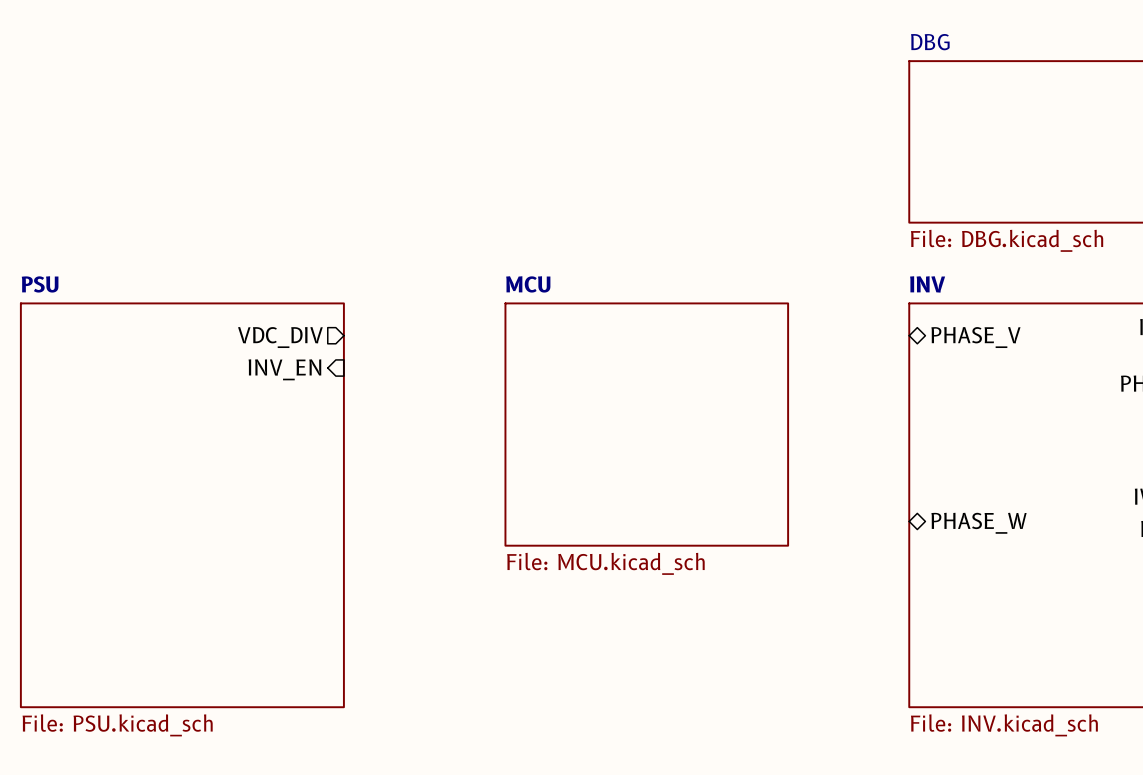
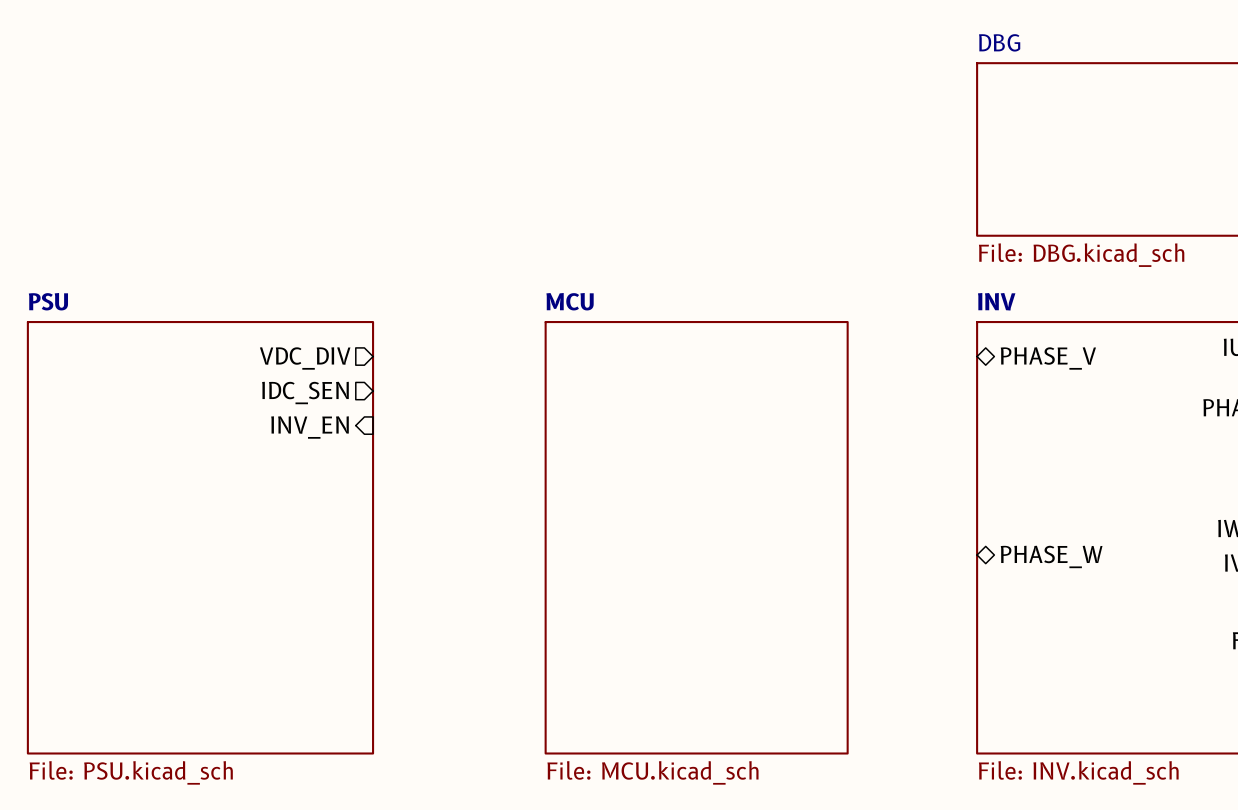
sheet pin shape: input (284, 369) -> output (305, 393)
sheet pin: INV_EN (284, 369) -> IDC_SEN (305, 393)
sheet pin: none -> INV_EN (310, 427)
sheet MCU: File: MCU.kicad_sch (646, 424) -> none
sheet MCU: none -> File: MCU.kicad_sch (696, 537)

